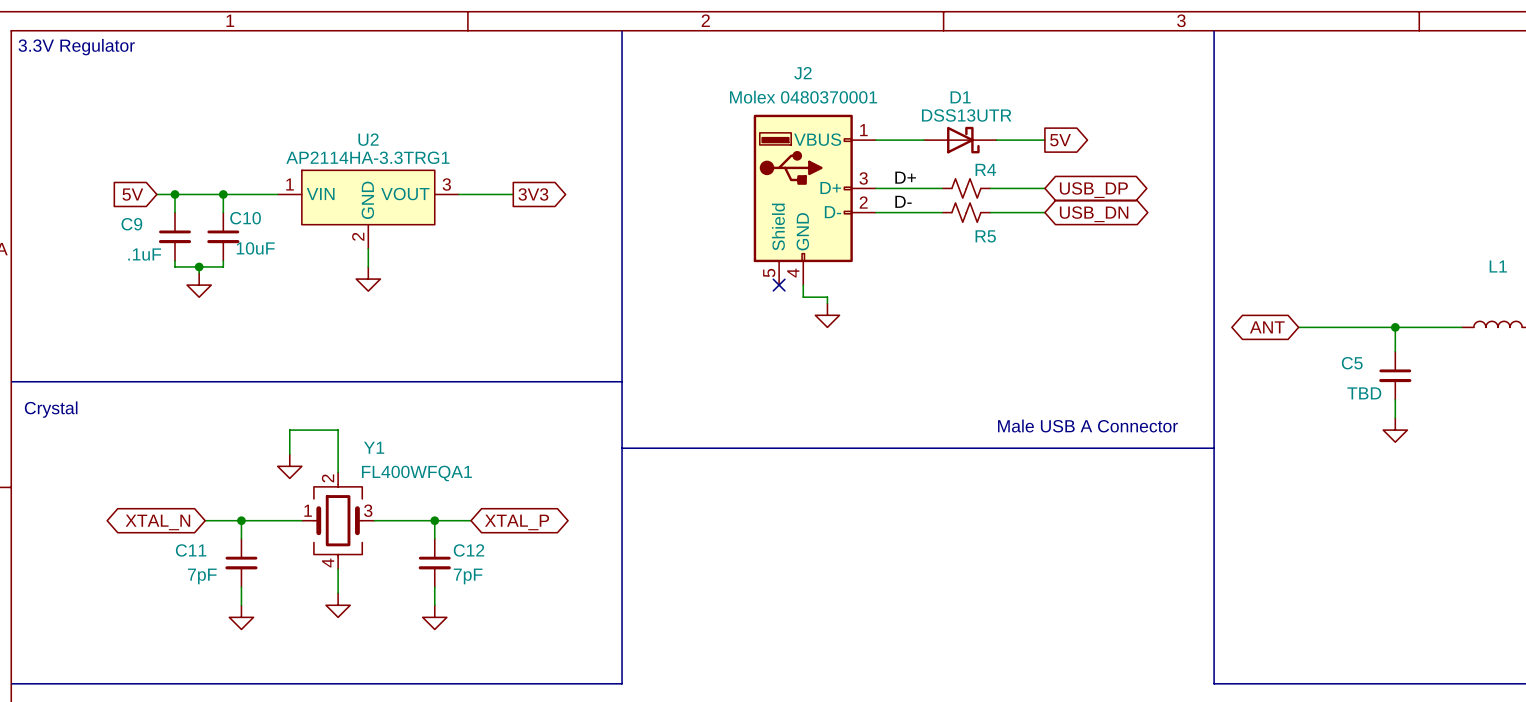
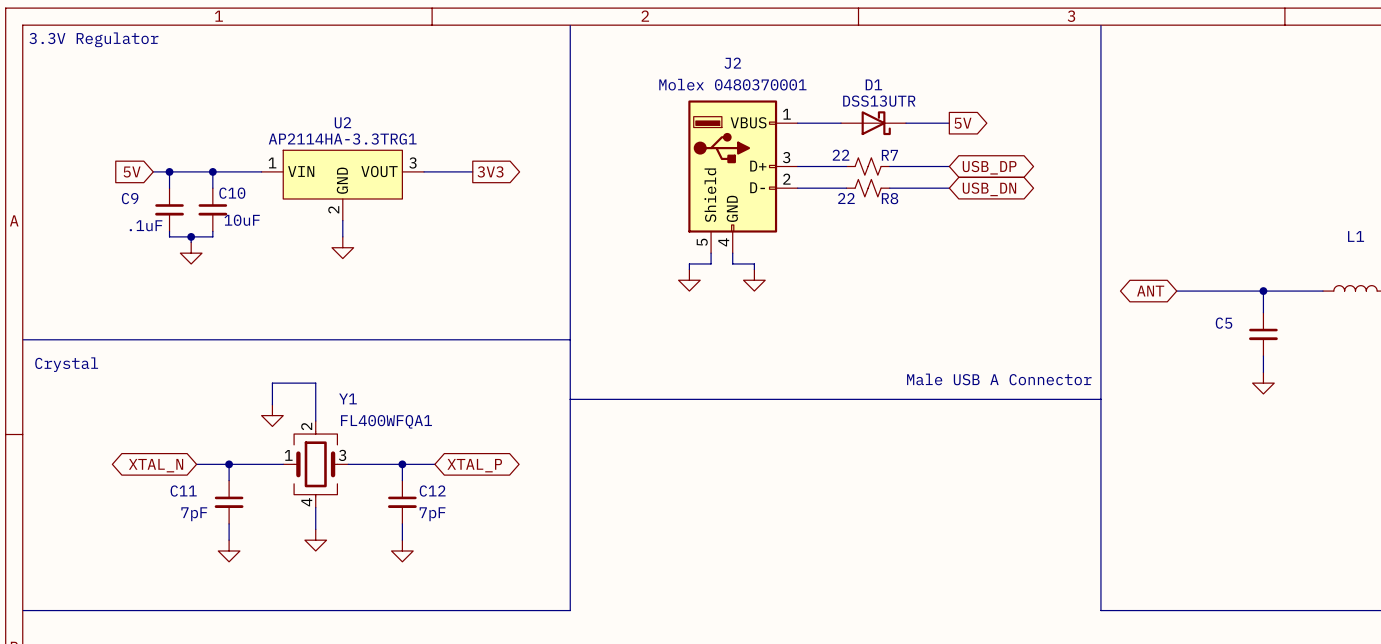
label: D+ (905, 177) -> none
R7: none -> 22 (868, 166)
R4: (966, 188) -> none
label: D- (903, 201) -> none
R8: none -> 22 (868, 188)
R5: (966, 212) -> none
wire: none -> (711, 253) (711, 263) (689, 263) (689, 269)
no-connect mark: (779, 285) -> none
power symbol: none -> (689, 280)
C5 value: TBD (1364, 393) -> none

